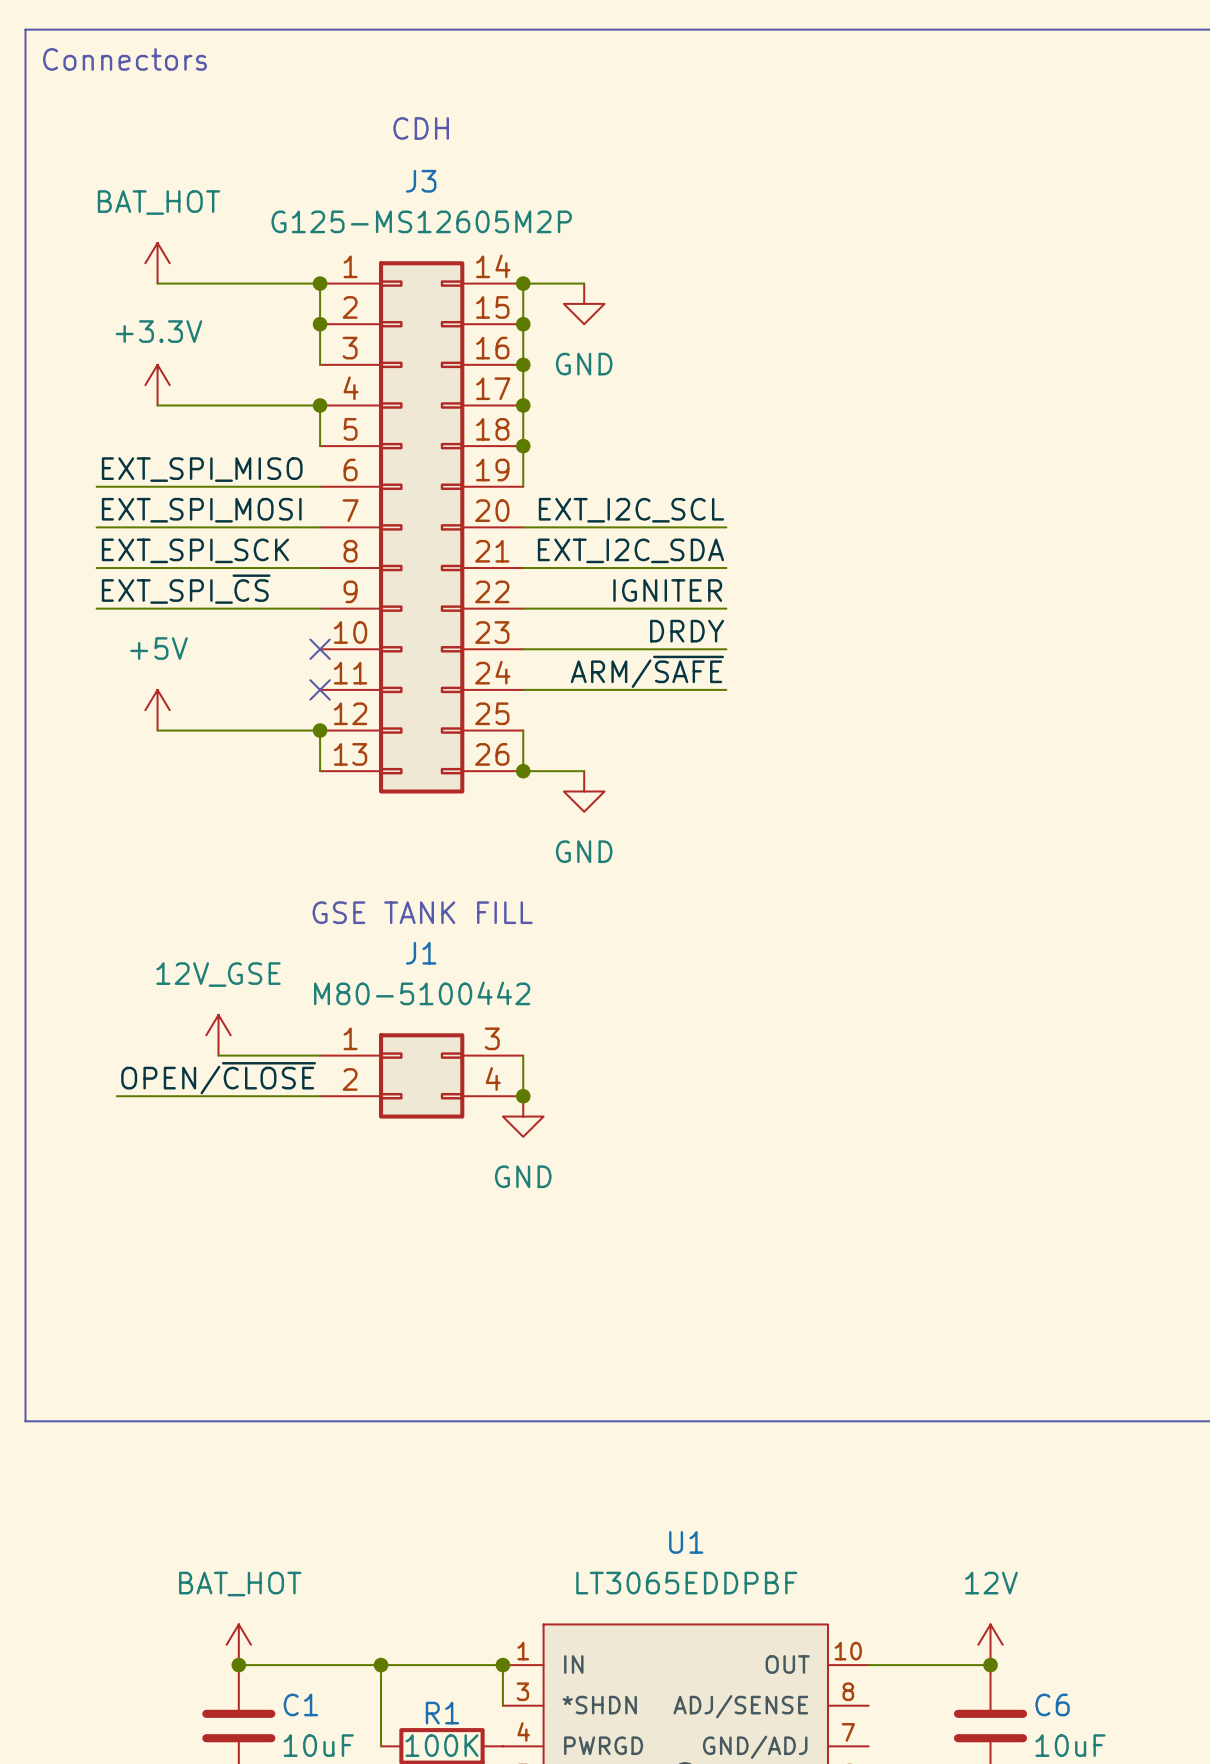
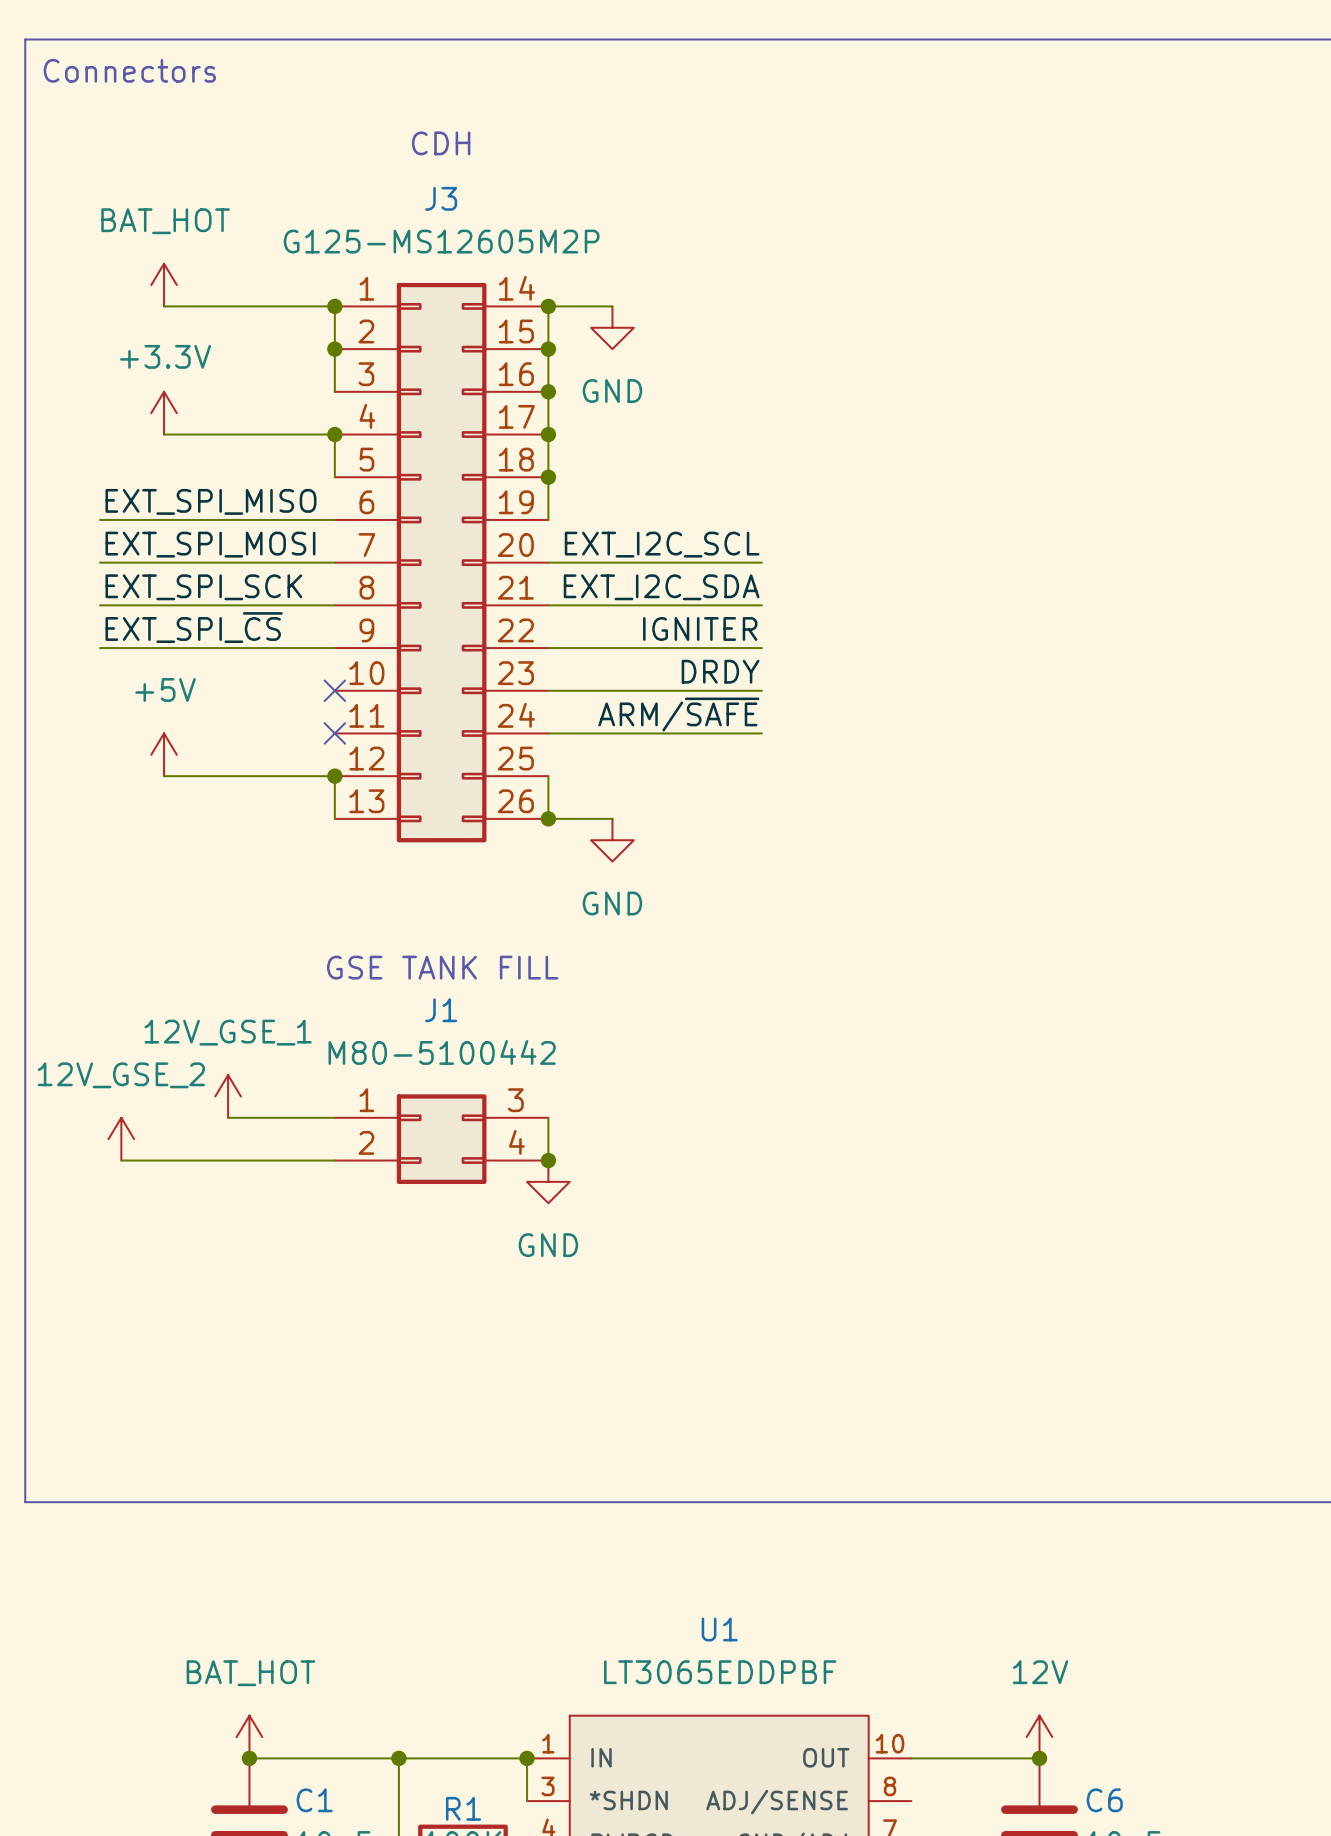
power symbol: 12V_GSE (218, 1035) -> 12V_GSE_1 (228, 1096)
power symbol: none -> 12V_GSE_2 (121, 1139)
label: OPEN/~{CLOSE} (218, 1078) -> none

